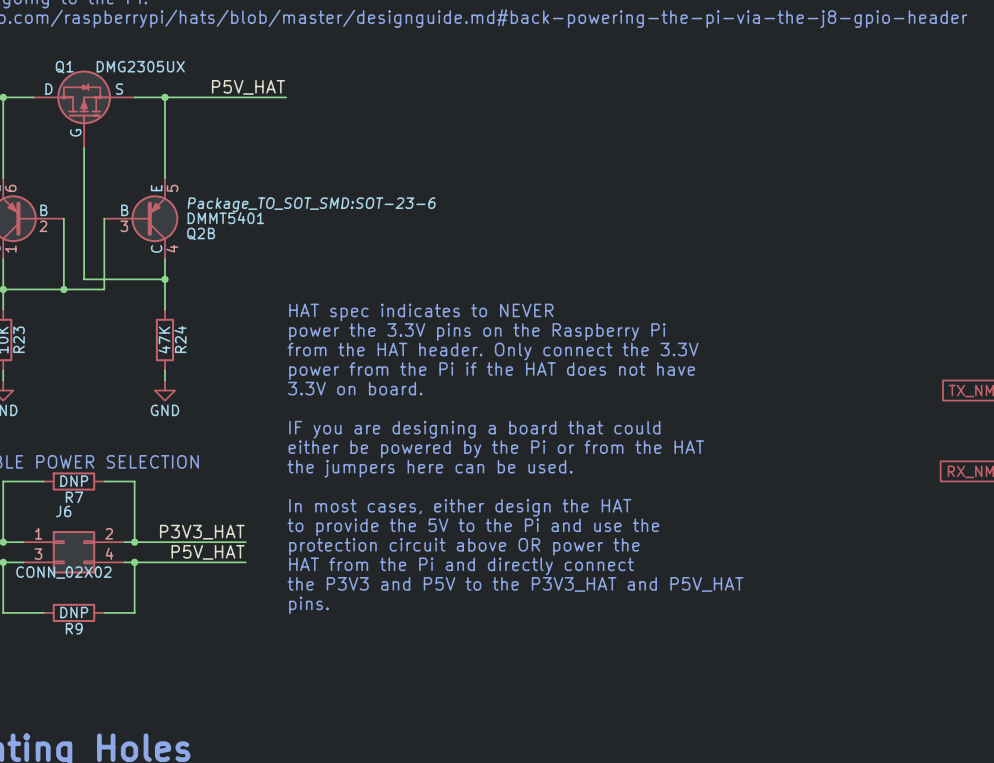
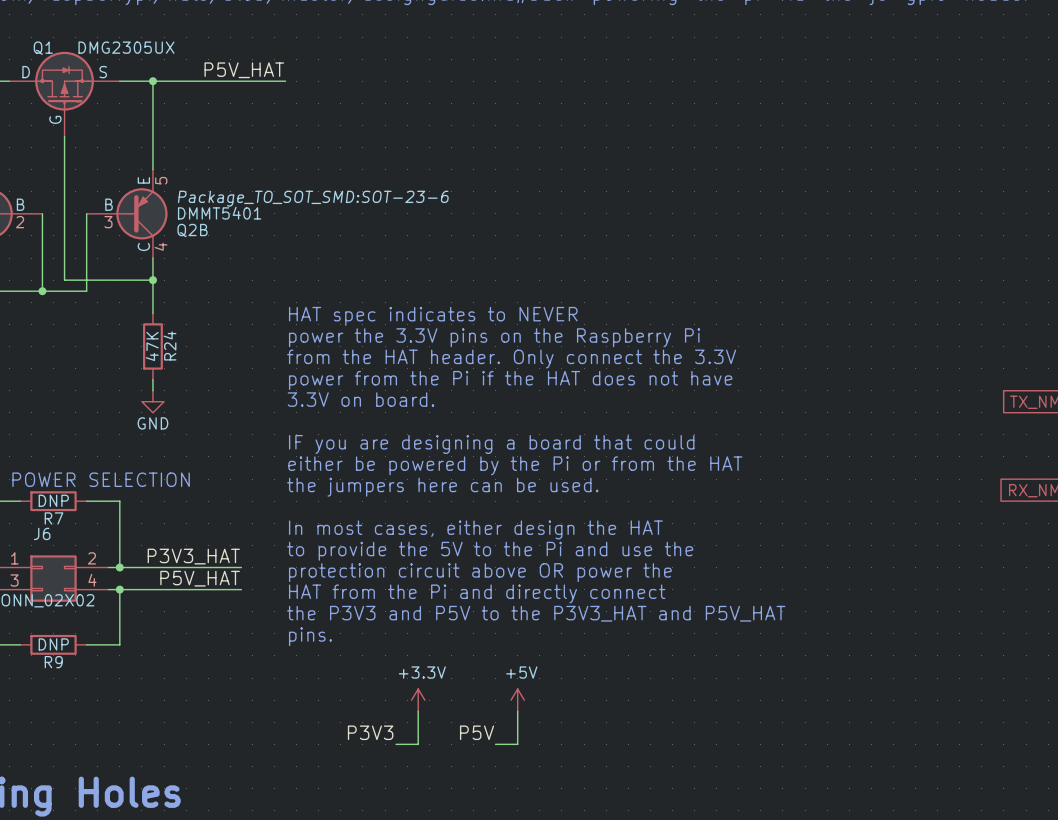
power symbol: none -> +3.3V (418, 700)
power symbol: none -> +5V (517, 700)
wire: none -> (418, 711) (418, 744) (396, 744)
wire: none -> (517, 711) (517, 744) (495, 744)
label: none -> P3V3 (370, 732)
label: none -> P5V (477, 732)

